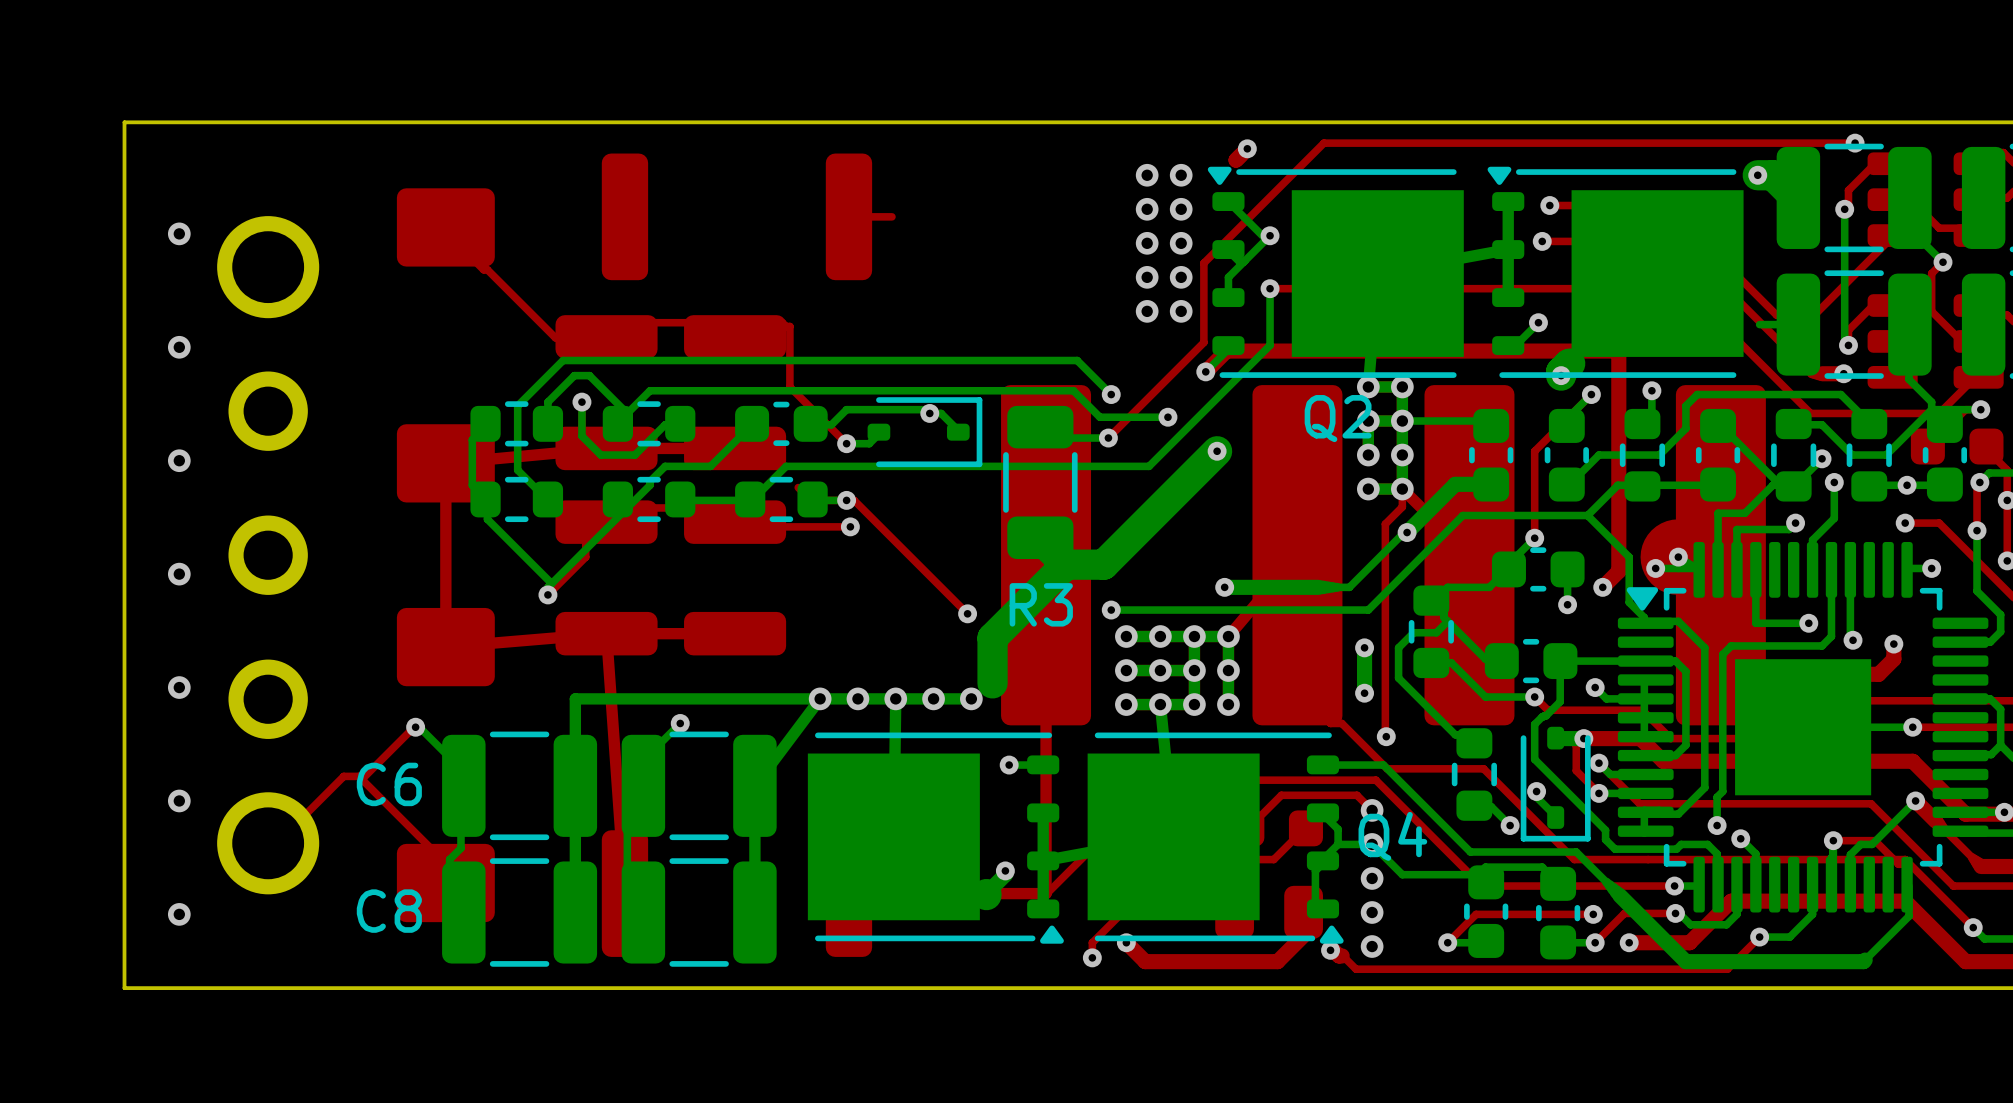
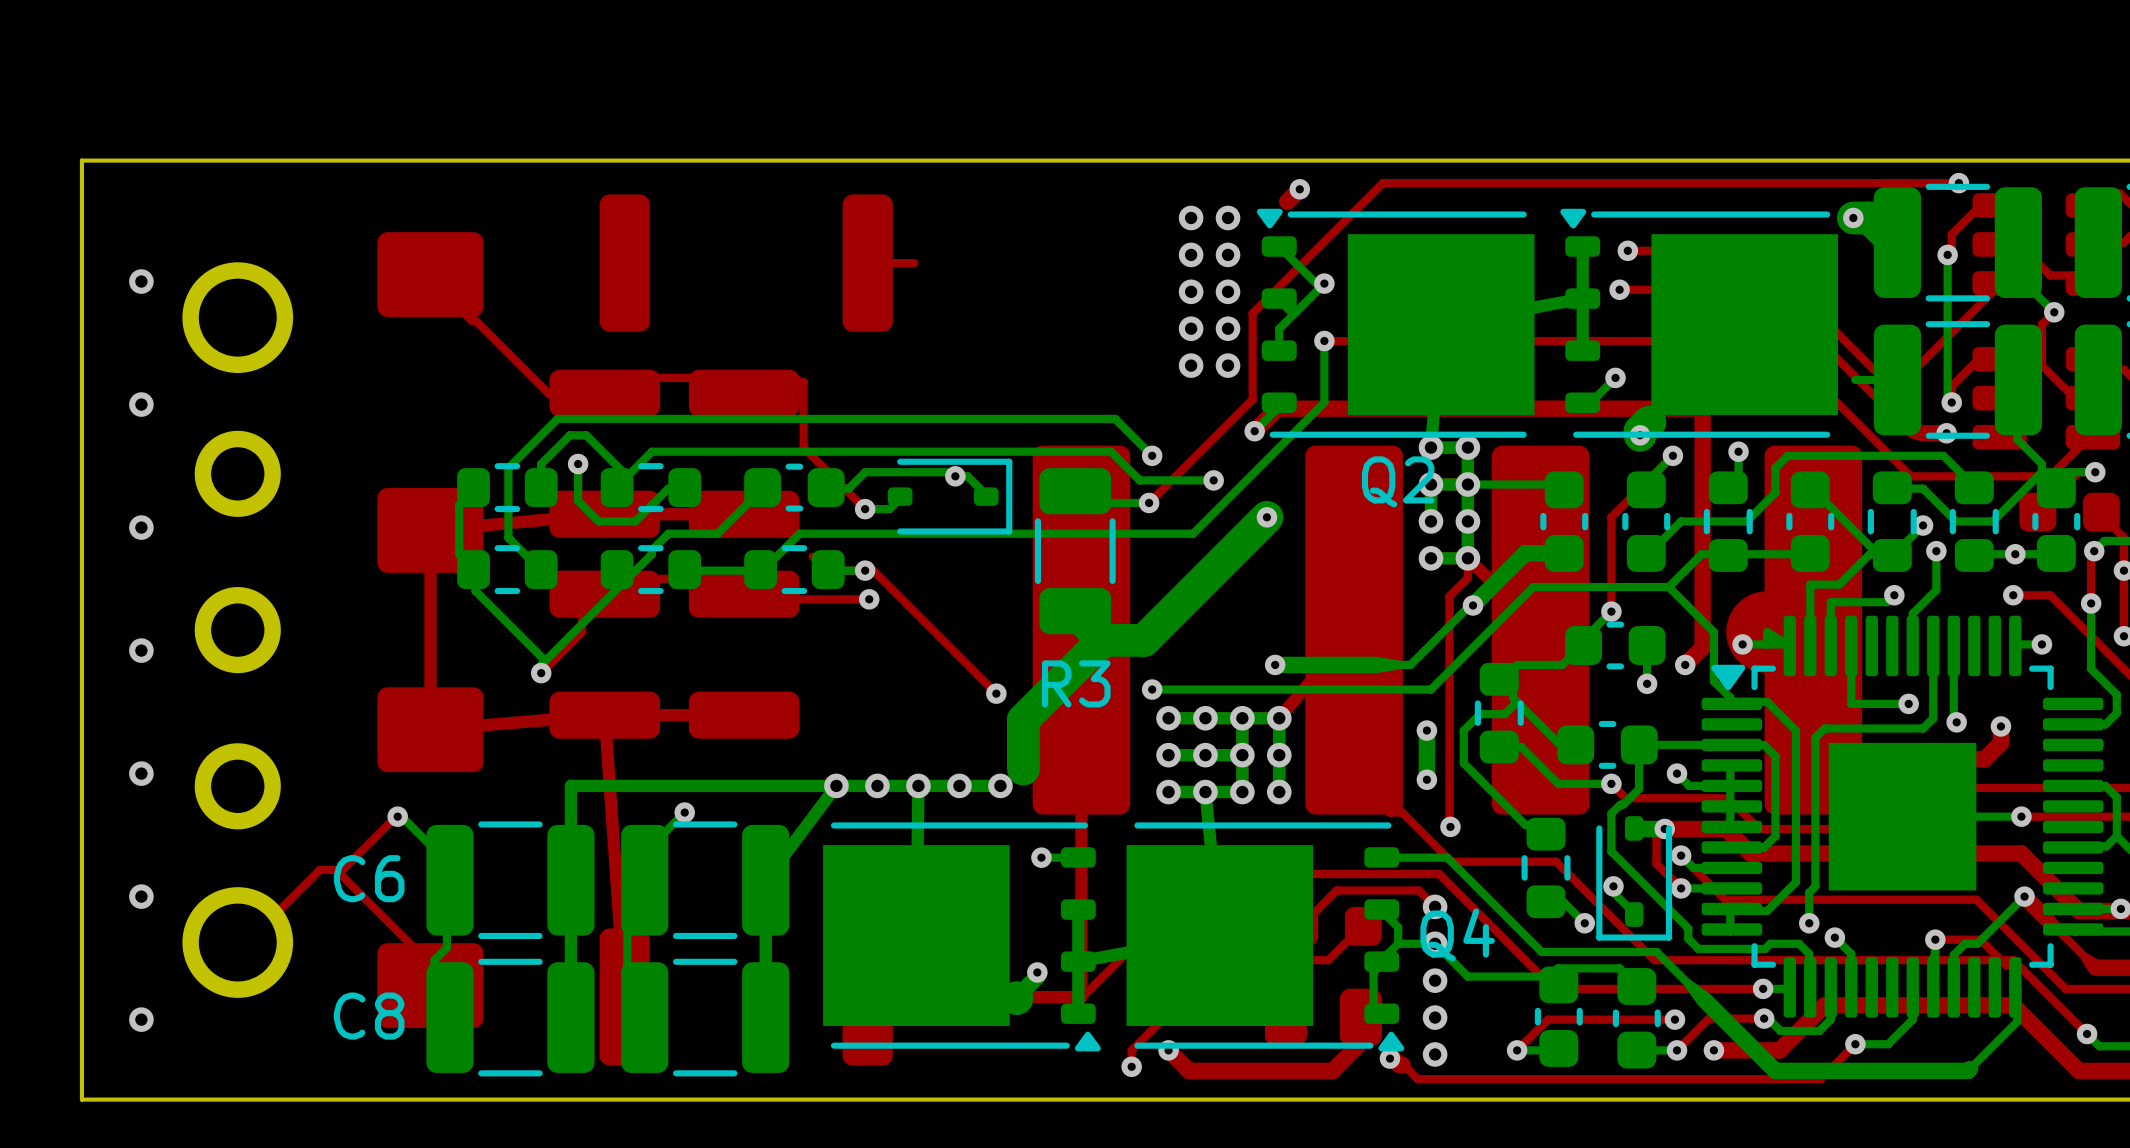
via: (1678, 557) -> none

